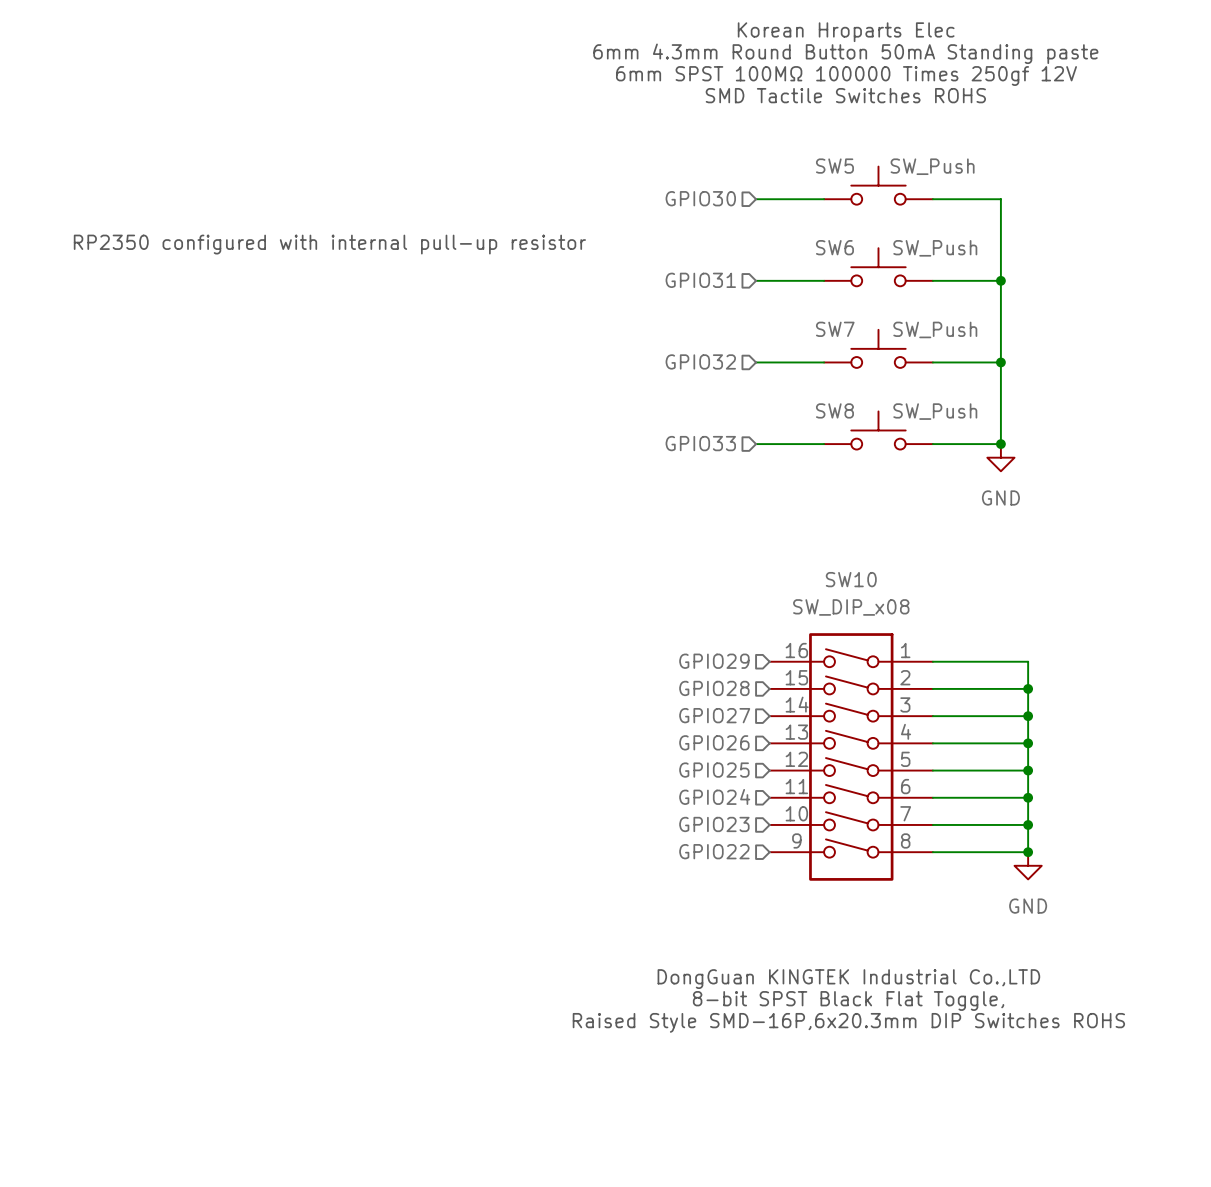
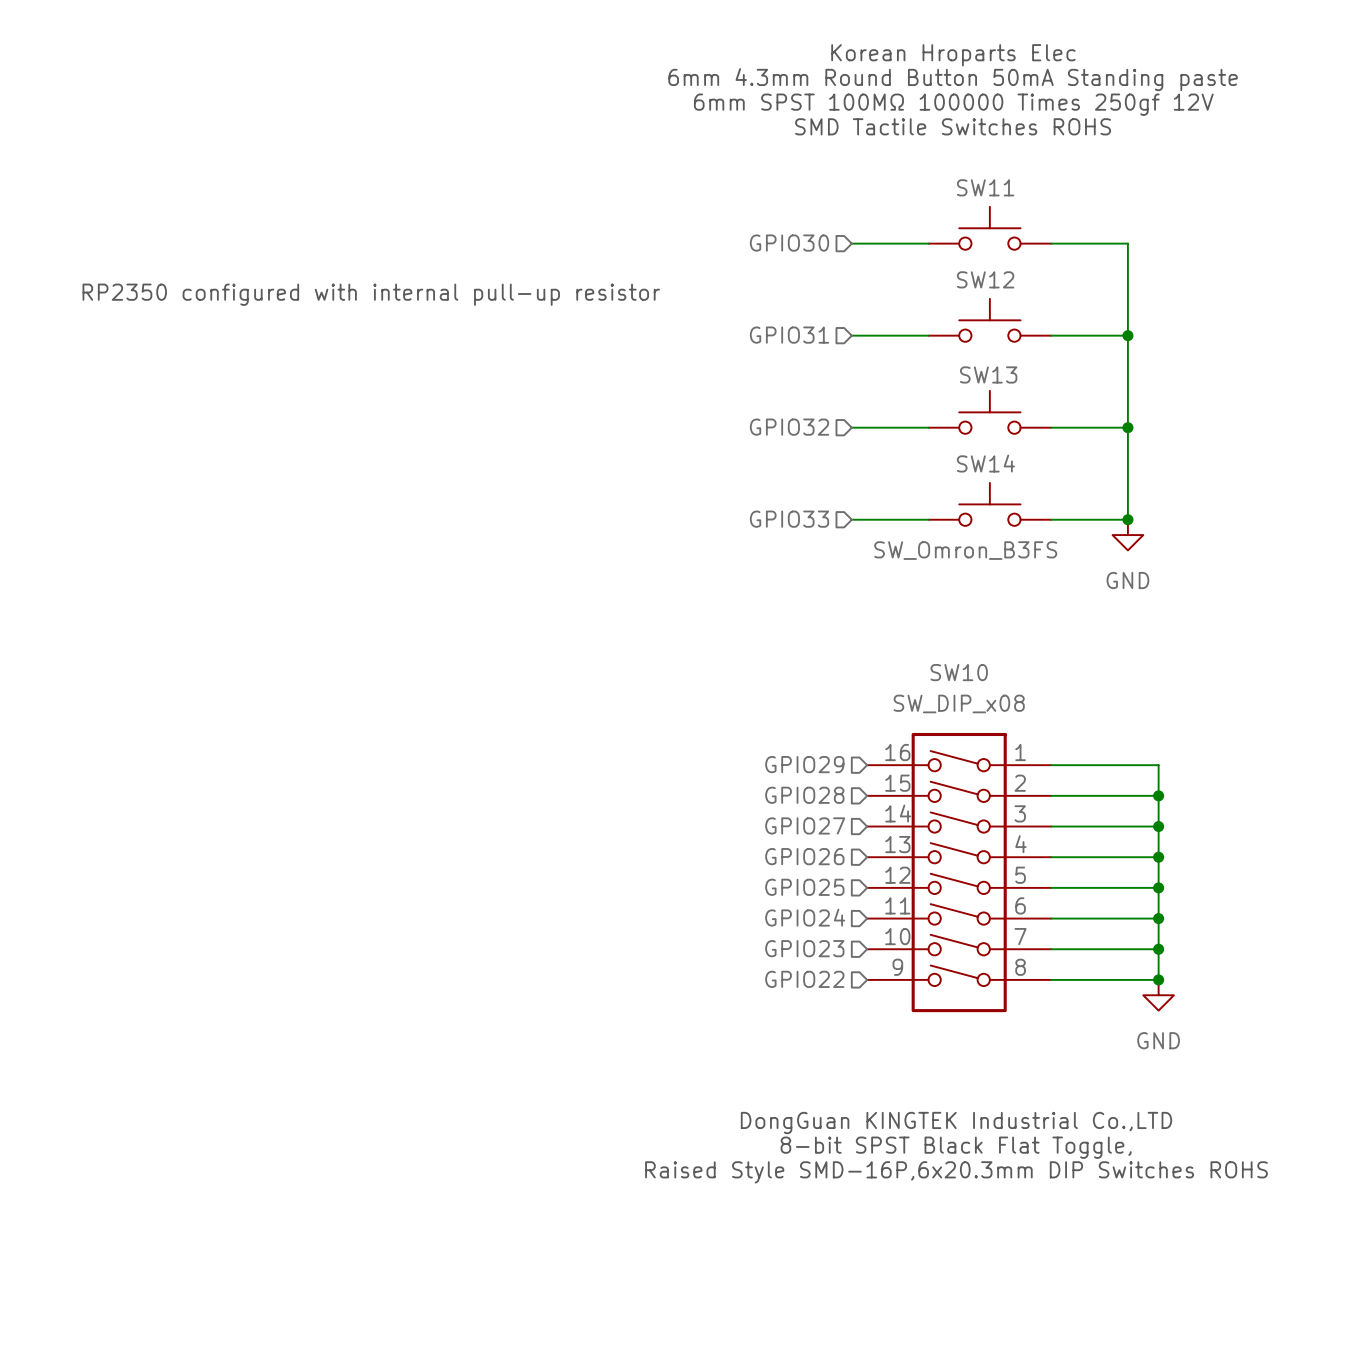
SW5 name: SW5 (834, 166) -> SW11 (985, 187)
SW5 value: SW_Push (932, 166) -> none
SW6 name: SW6 (834, 247) -> SW12 (985, 279)
SW6 value: SW_Push (935, 248) -> none
SW7 name: SW7 (835, 329) -> SW13 (988, 374)
SW7 value: SW_Push (935, 329) -> none
SW8 name: SW8 (834, 410) -> SW14 (985, 463)
SW8 value: SW_Push (935, 411) -> SW_Omron_B3FS (965, 550)

